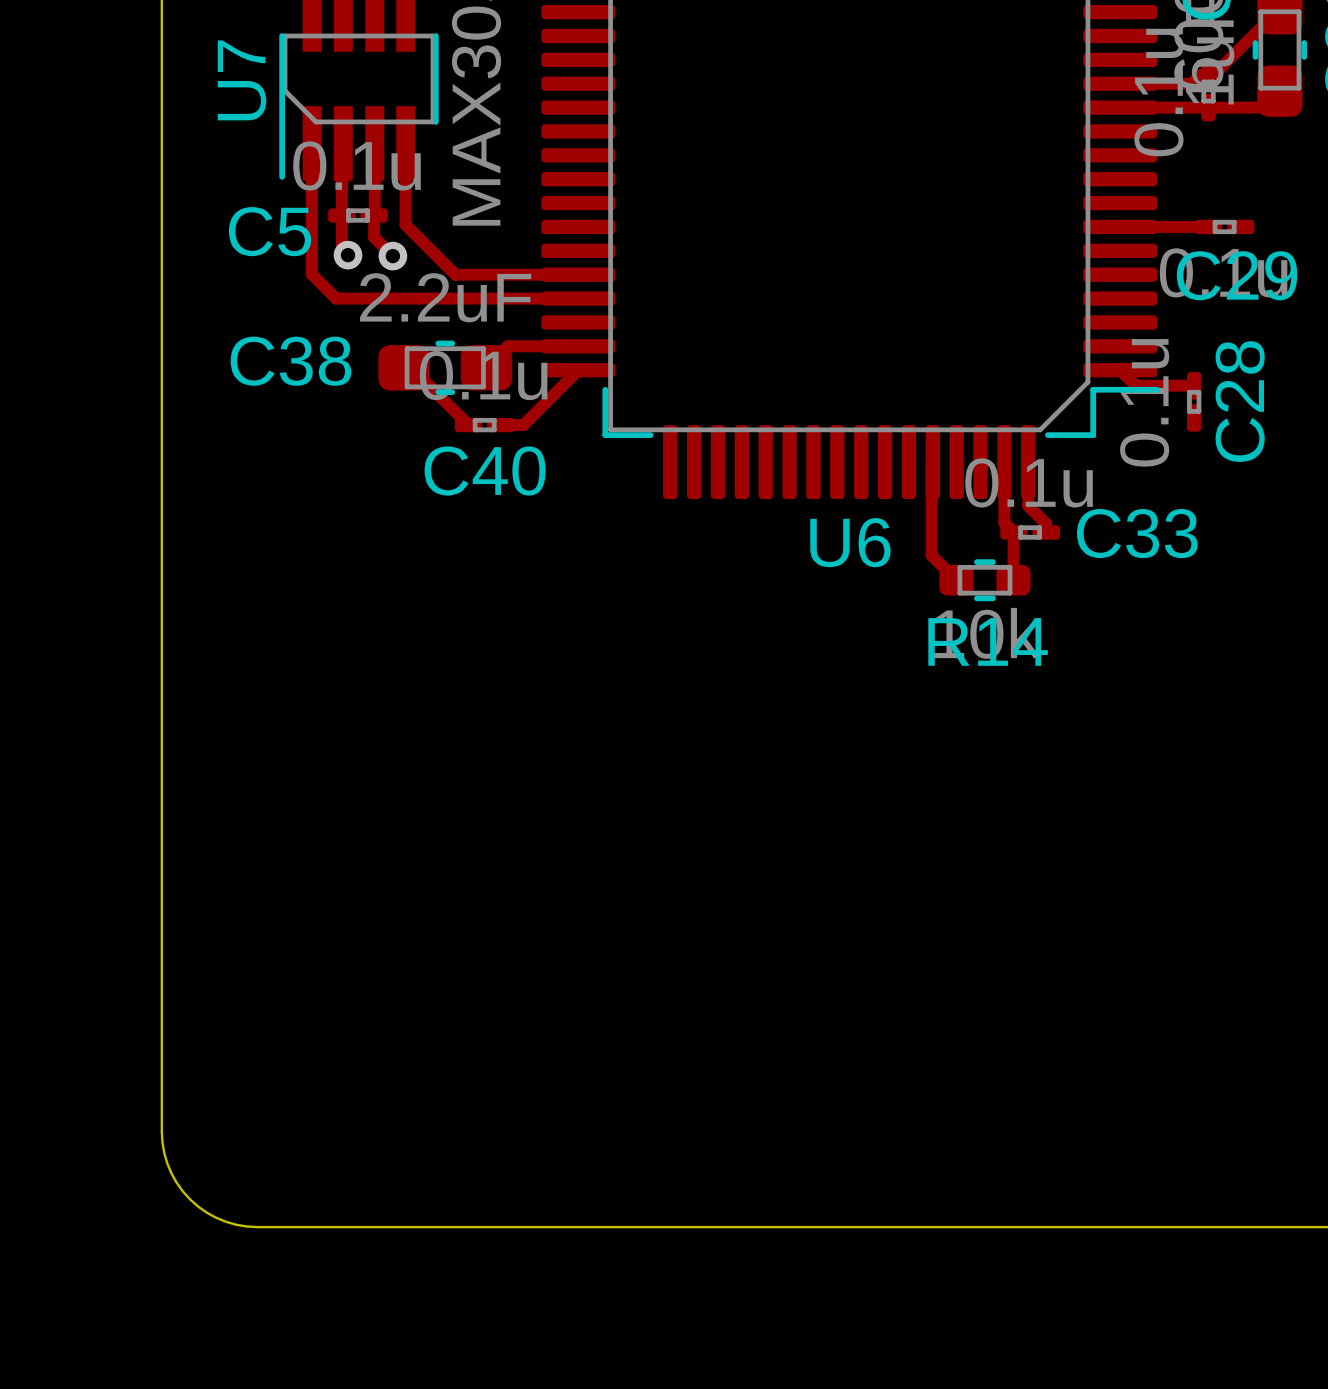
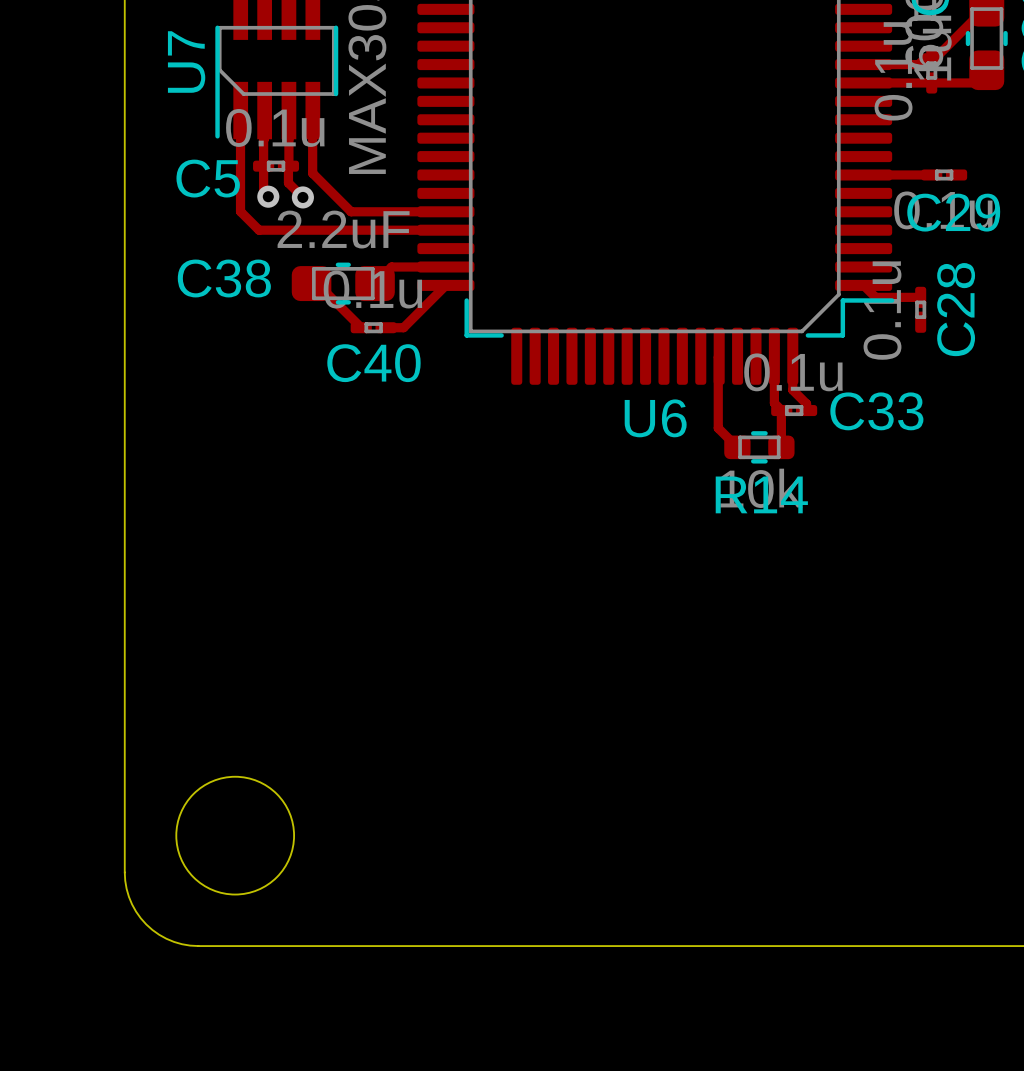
round board edge: none -> [175, 775, 295, 896]

